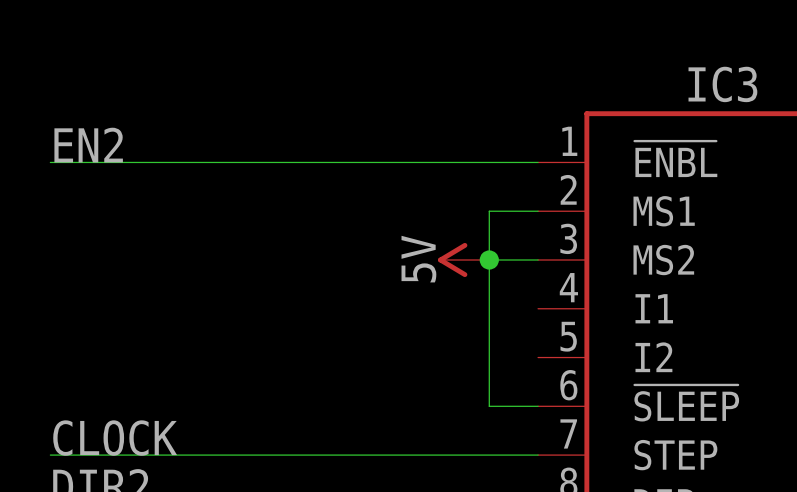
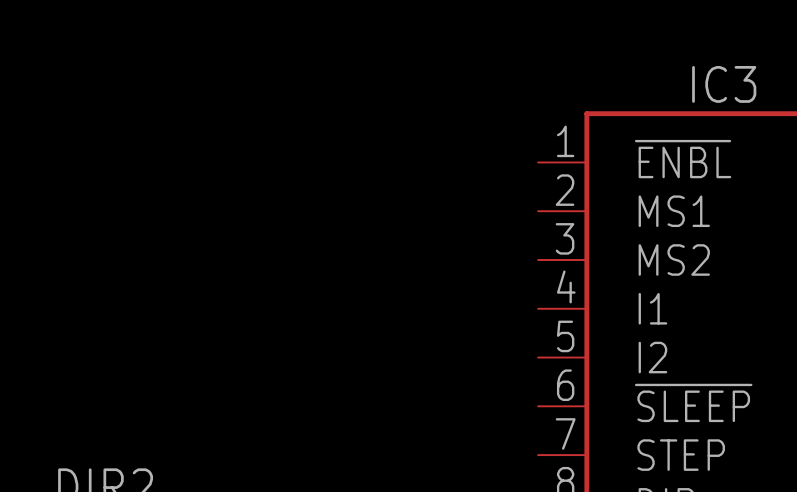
label: EN2 (88, 145) -> none
wire: (50, 162) (538, 162) -> none
wire: (538, 211) (489, 211) (489, 406) (538, 406) -> none
power symbol: 5V (463, 260) -> none
wire: (489, 260) (538, 260) -> none
junction: (489, 260) -> none
label: CLOCK (115, 438) -> none
wire: (50, 455) (538, 455) -> none

